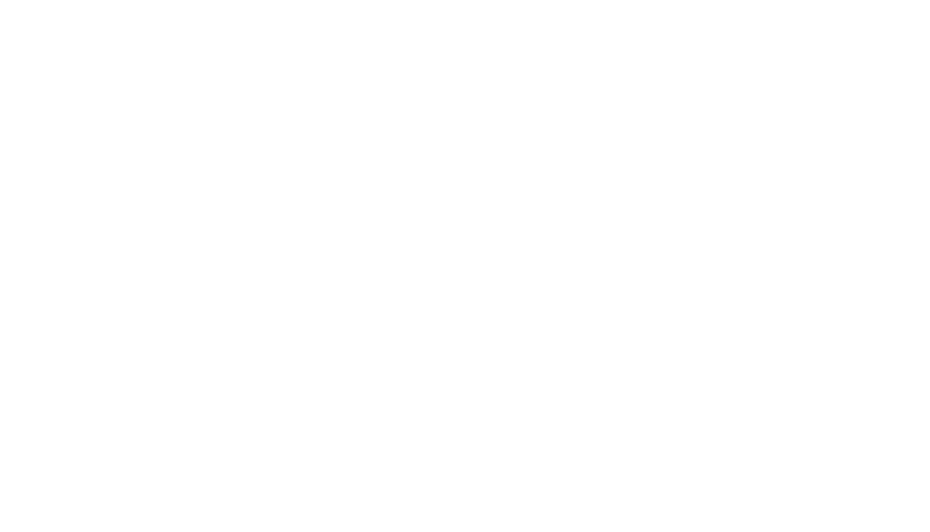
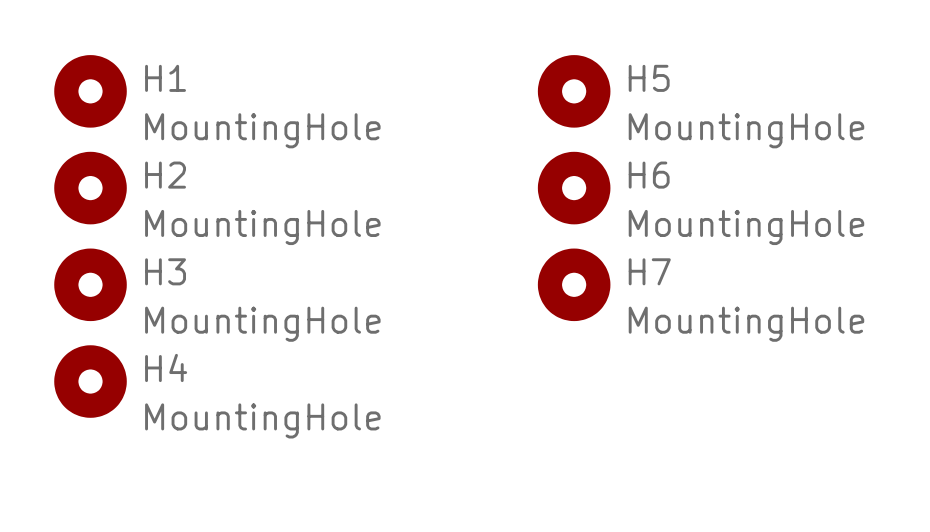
H1: none -> MountingHole (90, 91)
H5: none -> MountingHole (574, 91)
H2: none -> MountingHole (90, 188)
H6: none -> MountingHole (574, 188)
H3: none -> MountingHole (90, 284)
H7: none -> MountingHole (574, 284)
H4: none -> MountingHole (90, 381)

